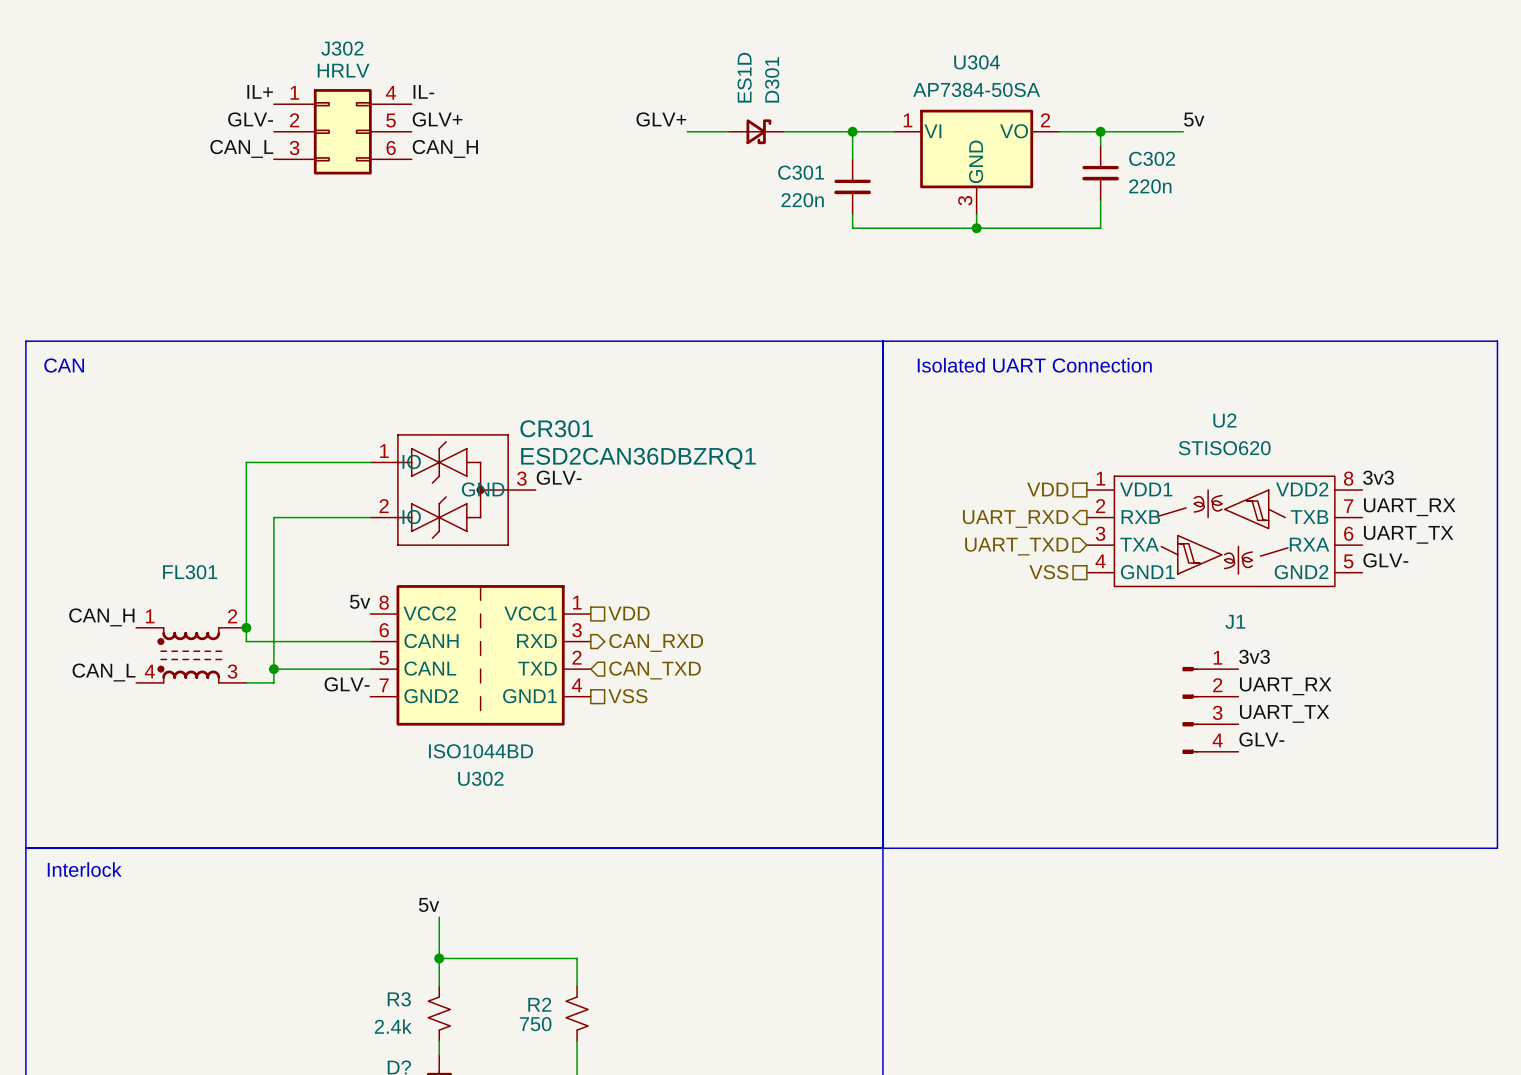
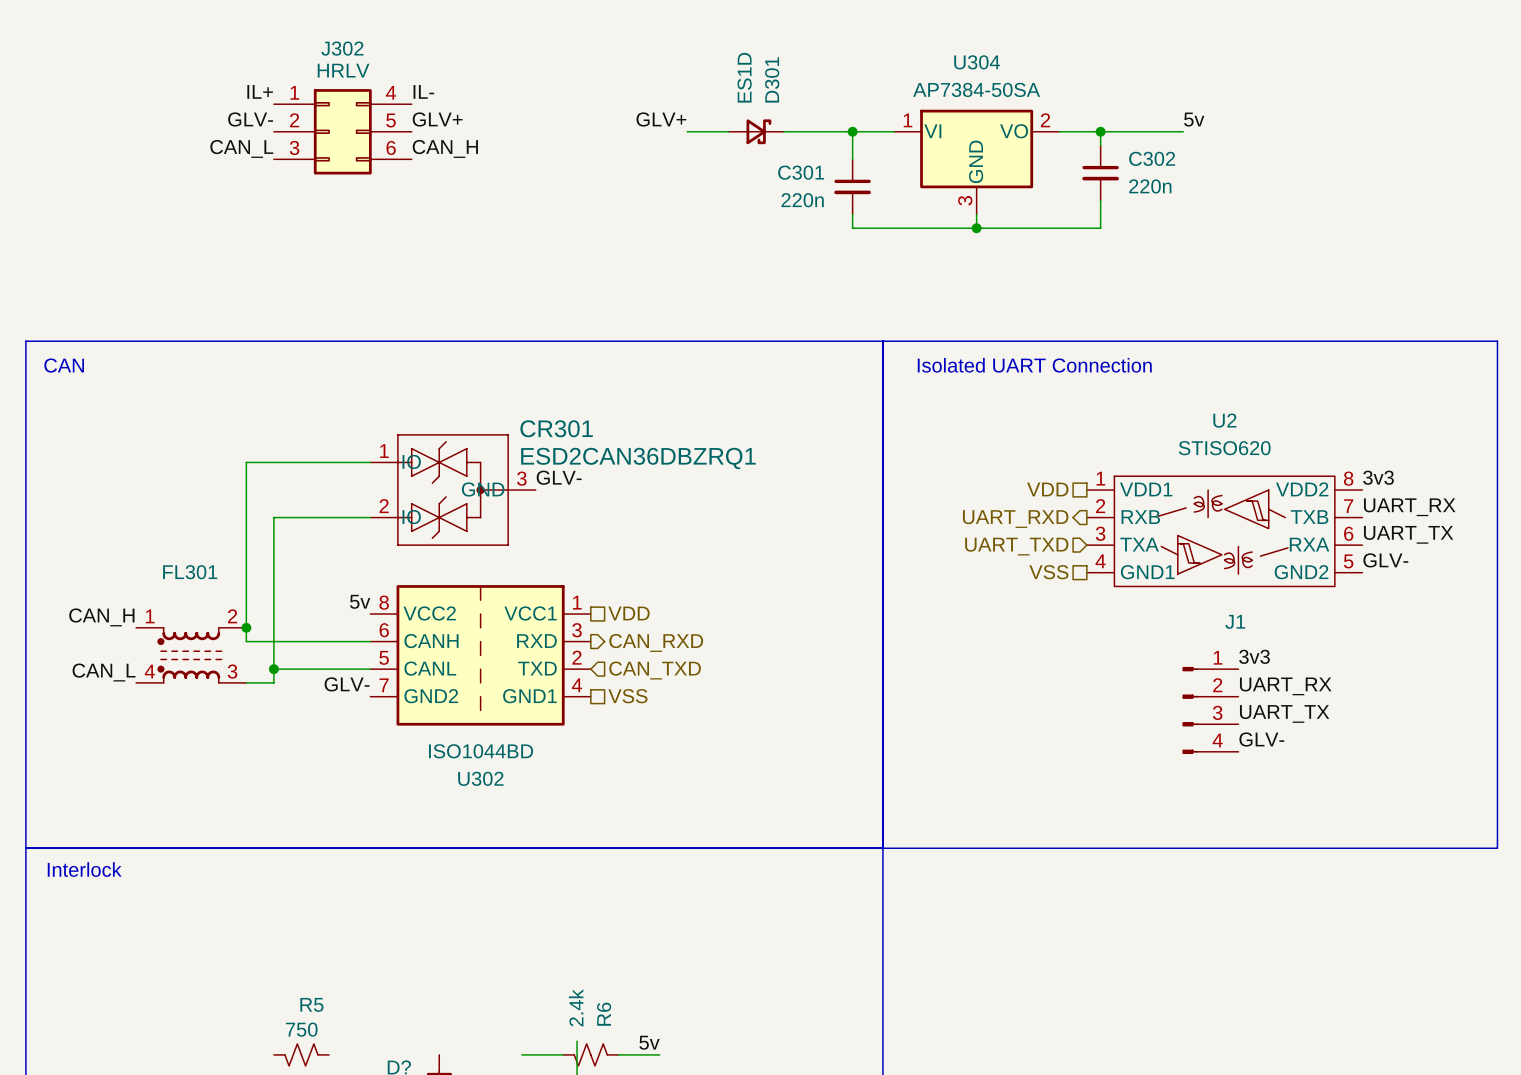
label position: 5v (429, 904) -> 5v (649, 1042)
wire: (439, 917) (439, 986) -> none
wire: (439, 958) (577, 958) (577, 986) -> none
junction: (439, 958) -> none
R3: 2.4k (439, 1013) -> none
R2: 750 (577, 1013) -> none
wire: (439, 1041) (439, 1054) -> none
R5: none -> 750 (301, 1054)
wire: none -> (521, 1054) (563, 1054)
R6: none -> 2.4k (590, 1054)
wire: none -> (618, 1054) (659, 1054)

